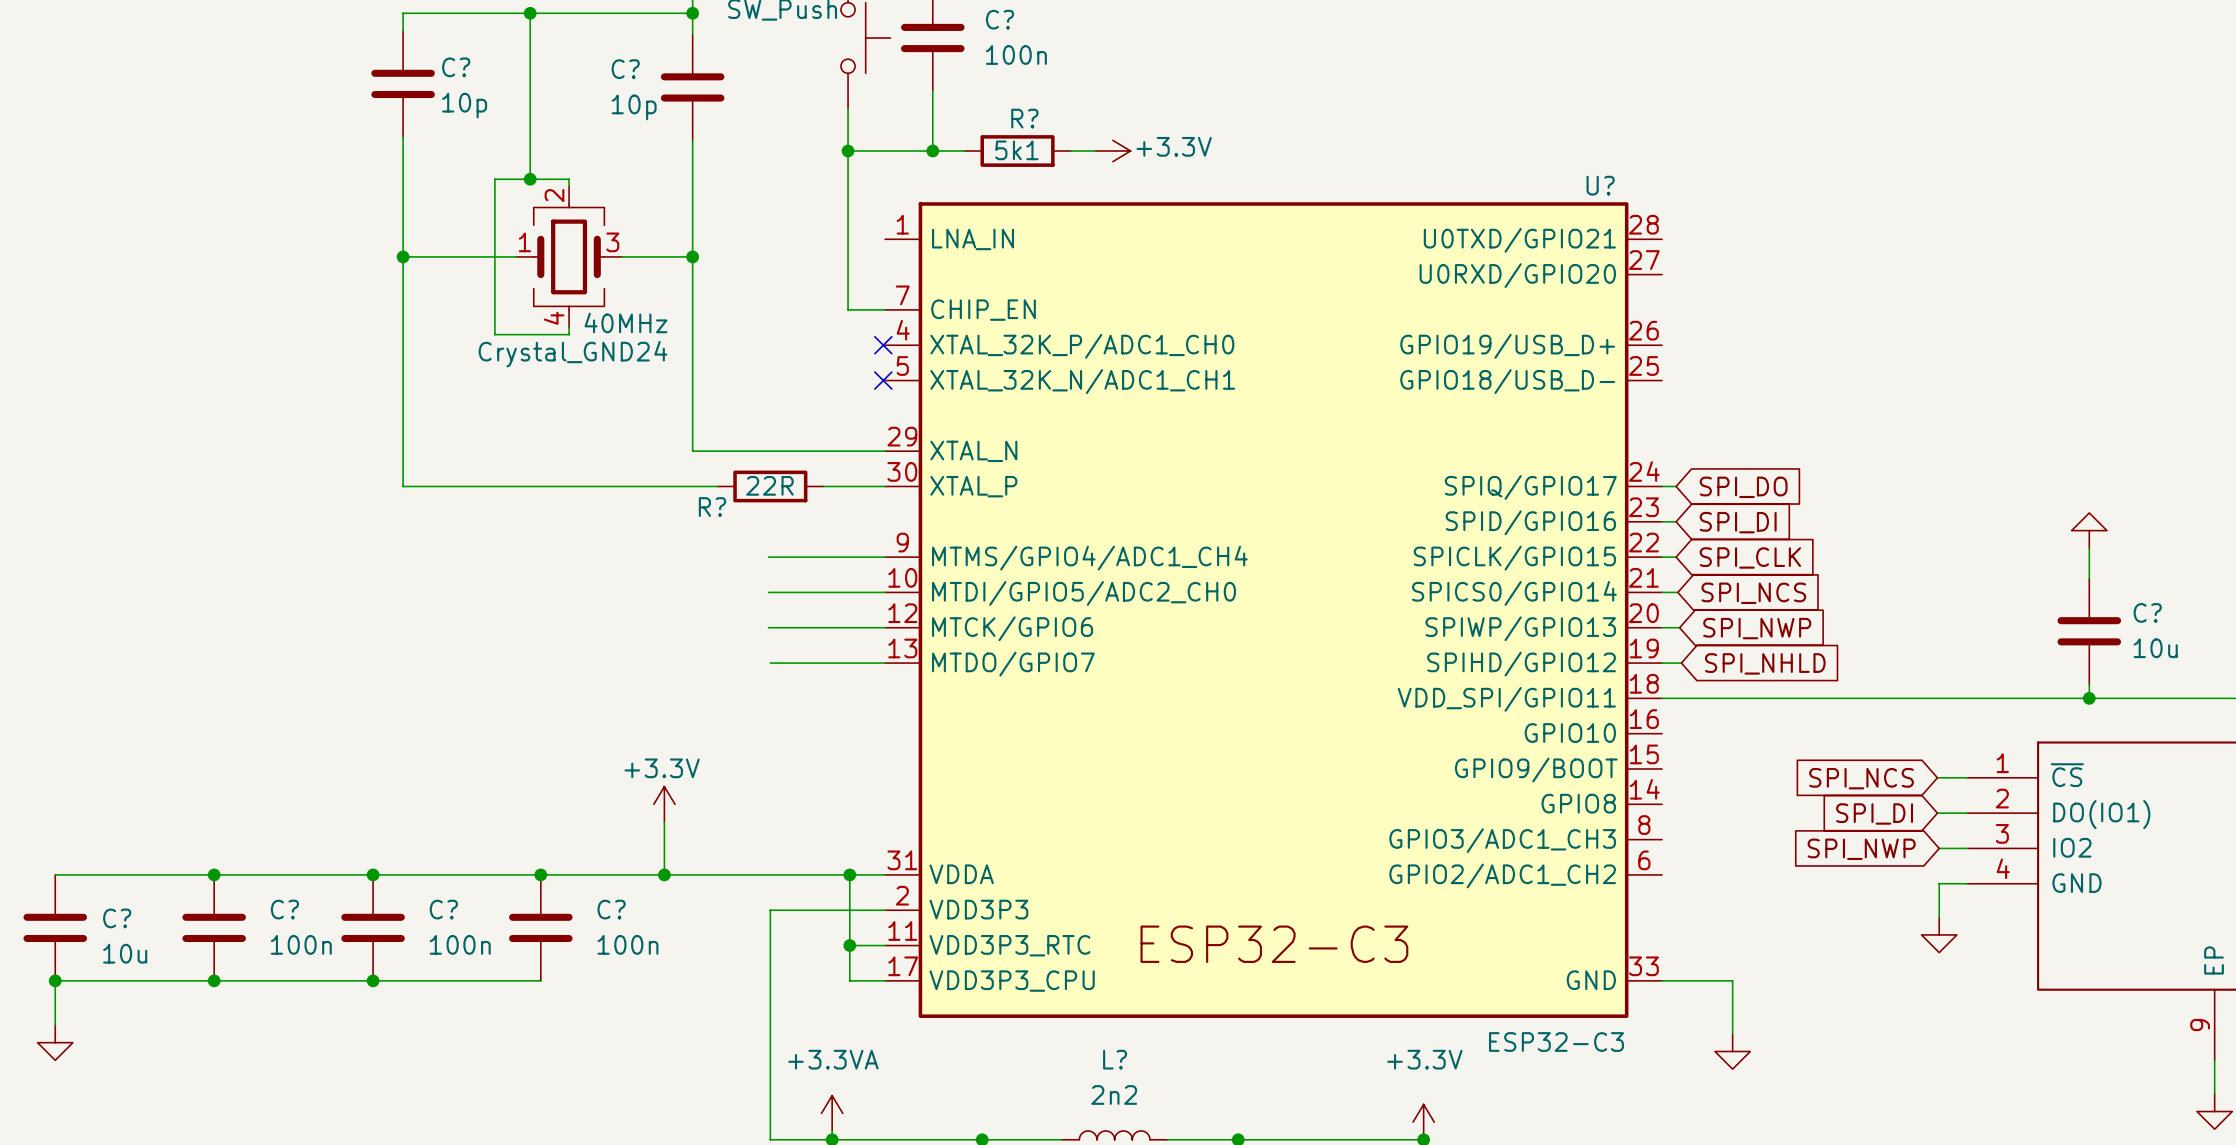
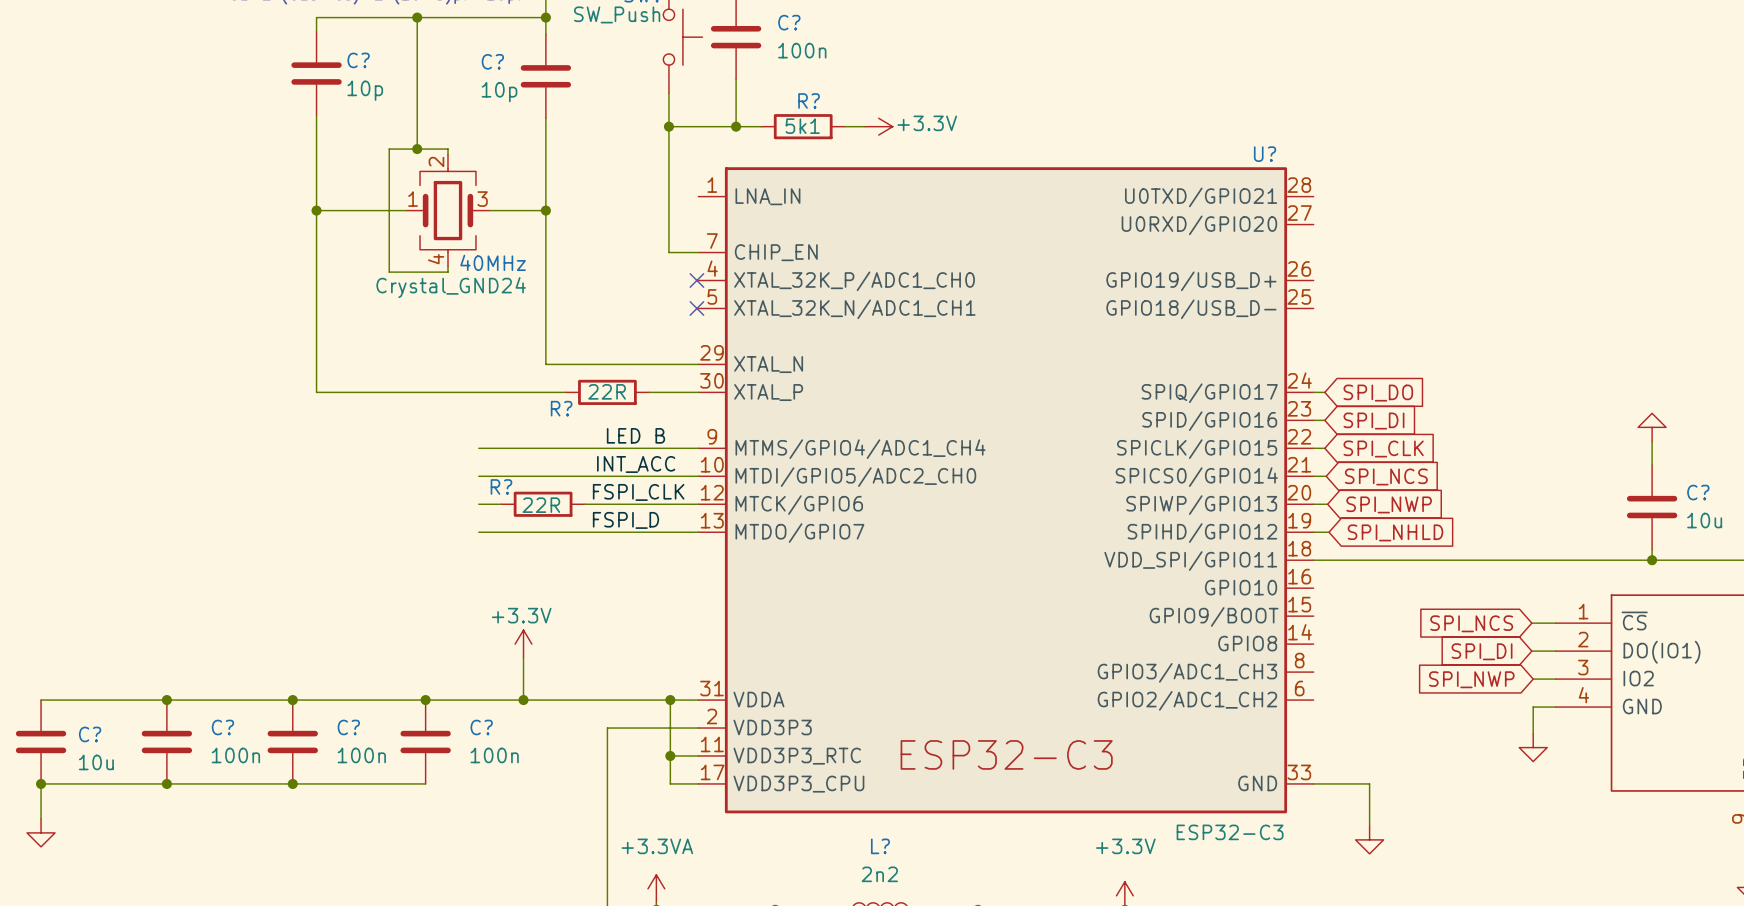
label: none -> LED B (635, 435)
wire: none -> (478, 448) (606, 448)
label: none -> INT_ACC (636, 464)
wire: none -> (478, 476) (606, 476)
label: none -> FSPI_CLK (638, 492)
wire: none -> (478, 504) (501, 504)
R?: none -> 22R (543, 504)
wire: none -> (585, 504) (606, 504)
label: none -> FSPI_D (625, 520)
wire: none -> (478, 532) (607, 532)

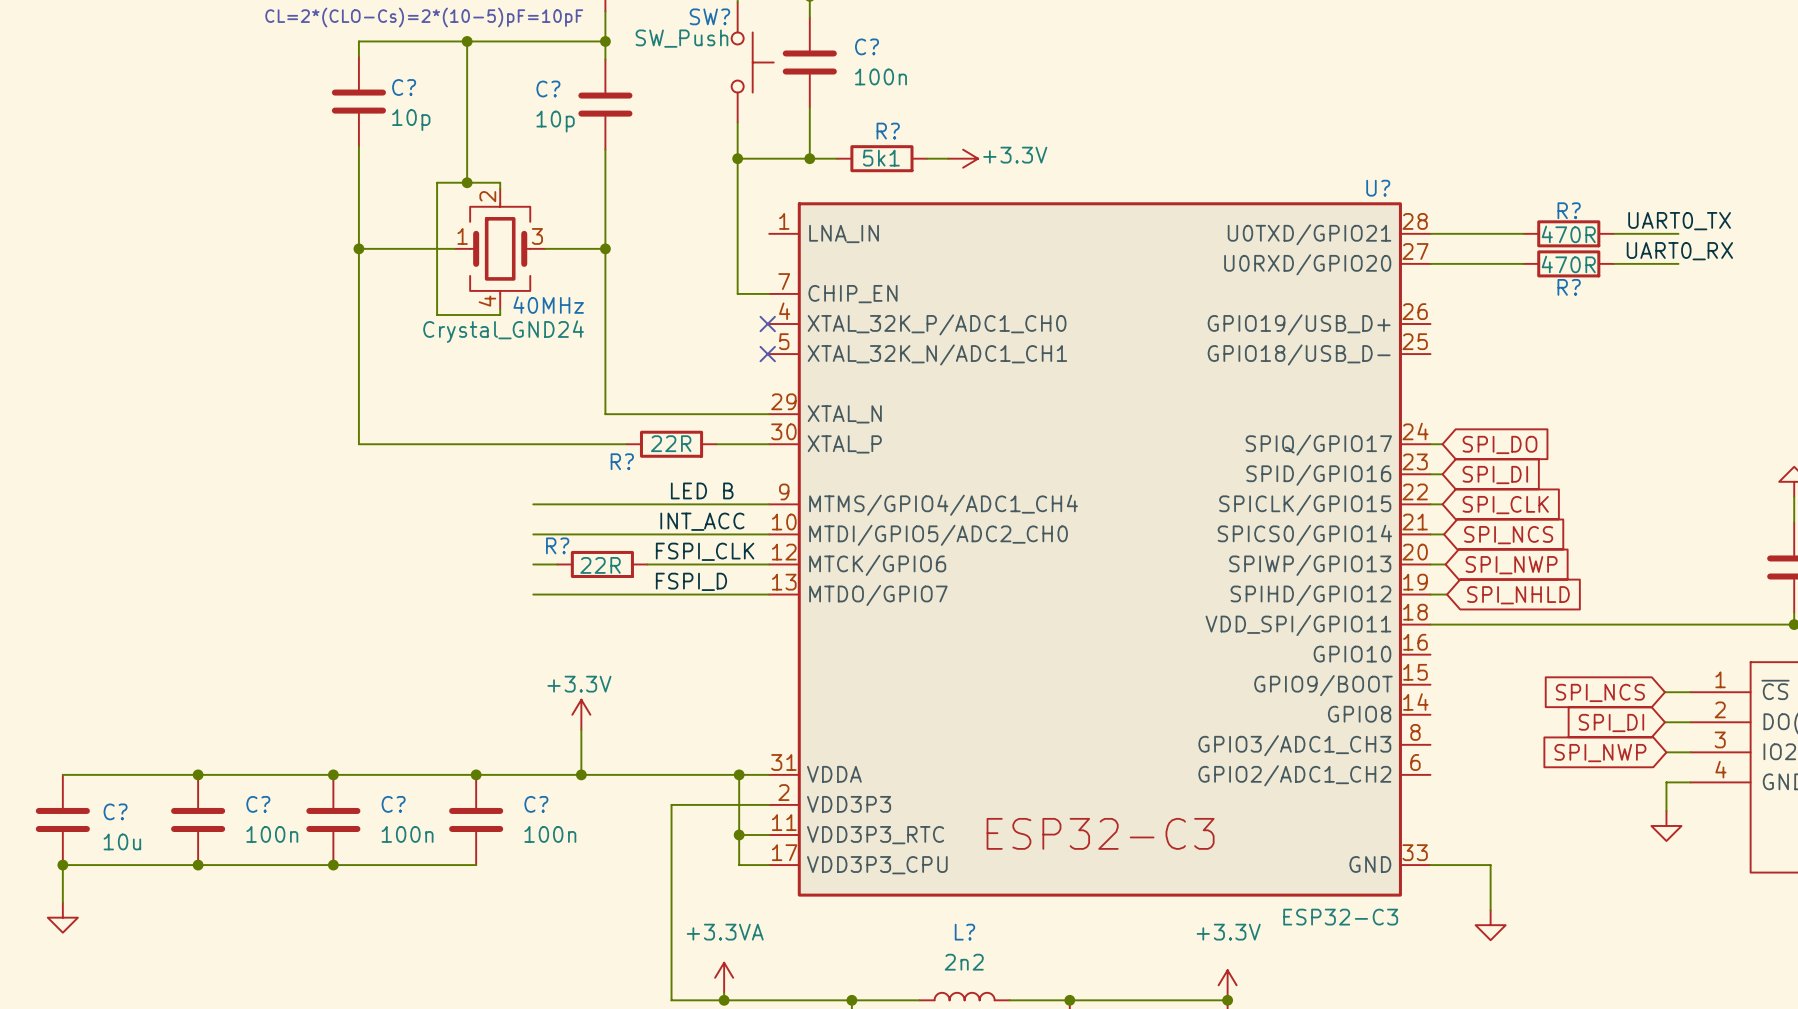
label: none -> UART0_TX (1679, 221)
wire: none -> (1430, 233) (1523, 233)
R?: none -> 470R (1568, 233)
wire: none -> (1613, 233) (1678, 233)
label: none -> UART0_RX (1679, 251)
wire: none -> (1430, 263) (1523, 263)
R?: none -> 470R (1568, 263)
wire: none -> (1613, 263) (1678, 263)

